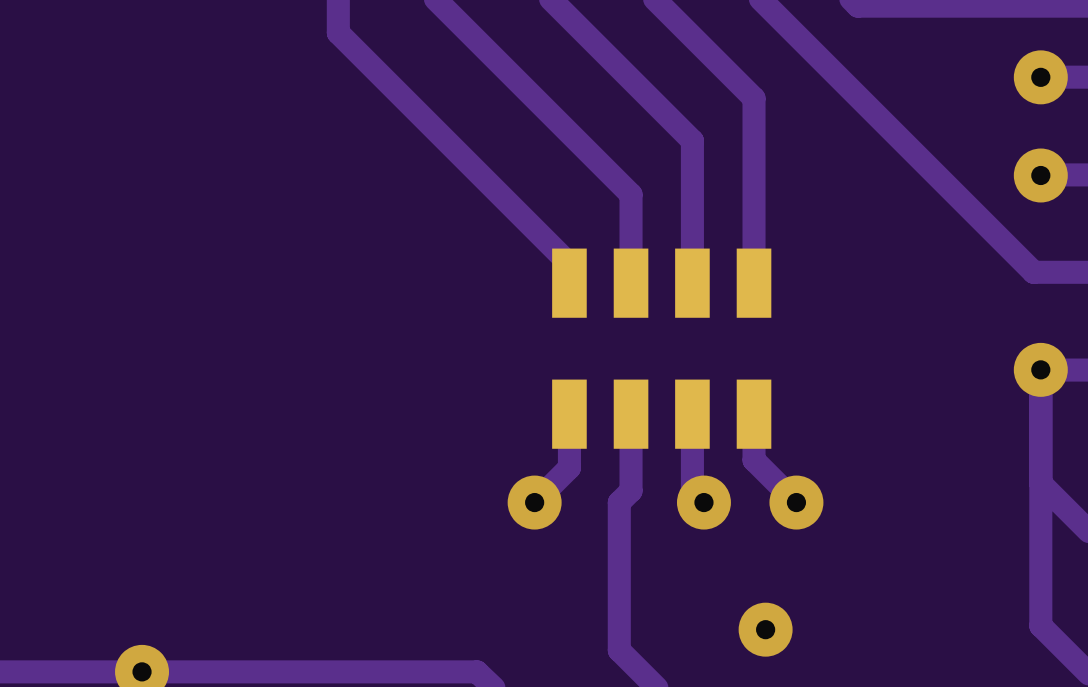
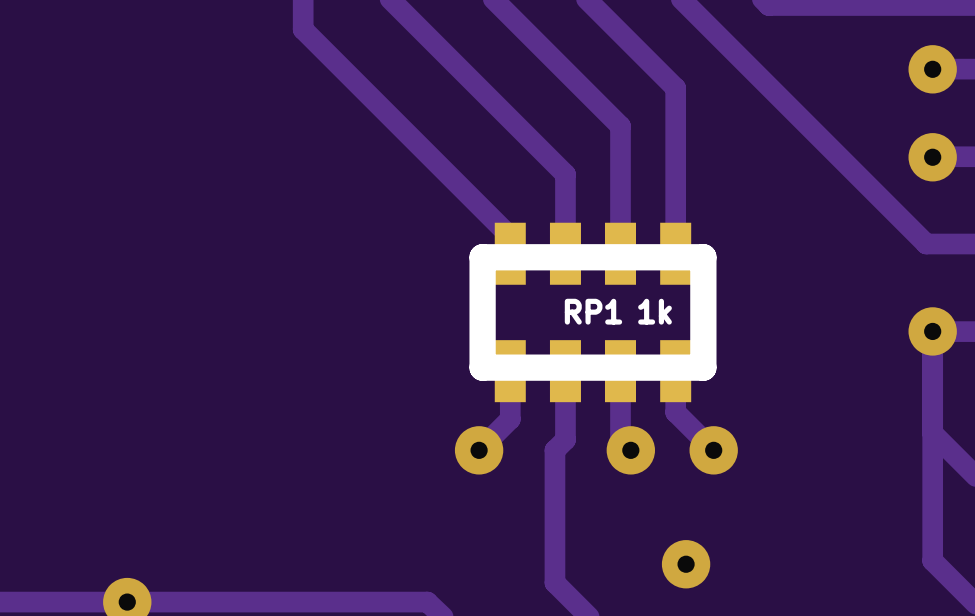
part: (661, 348) -> none
RP1: none -> 1k (592, 312)

